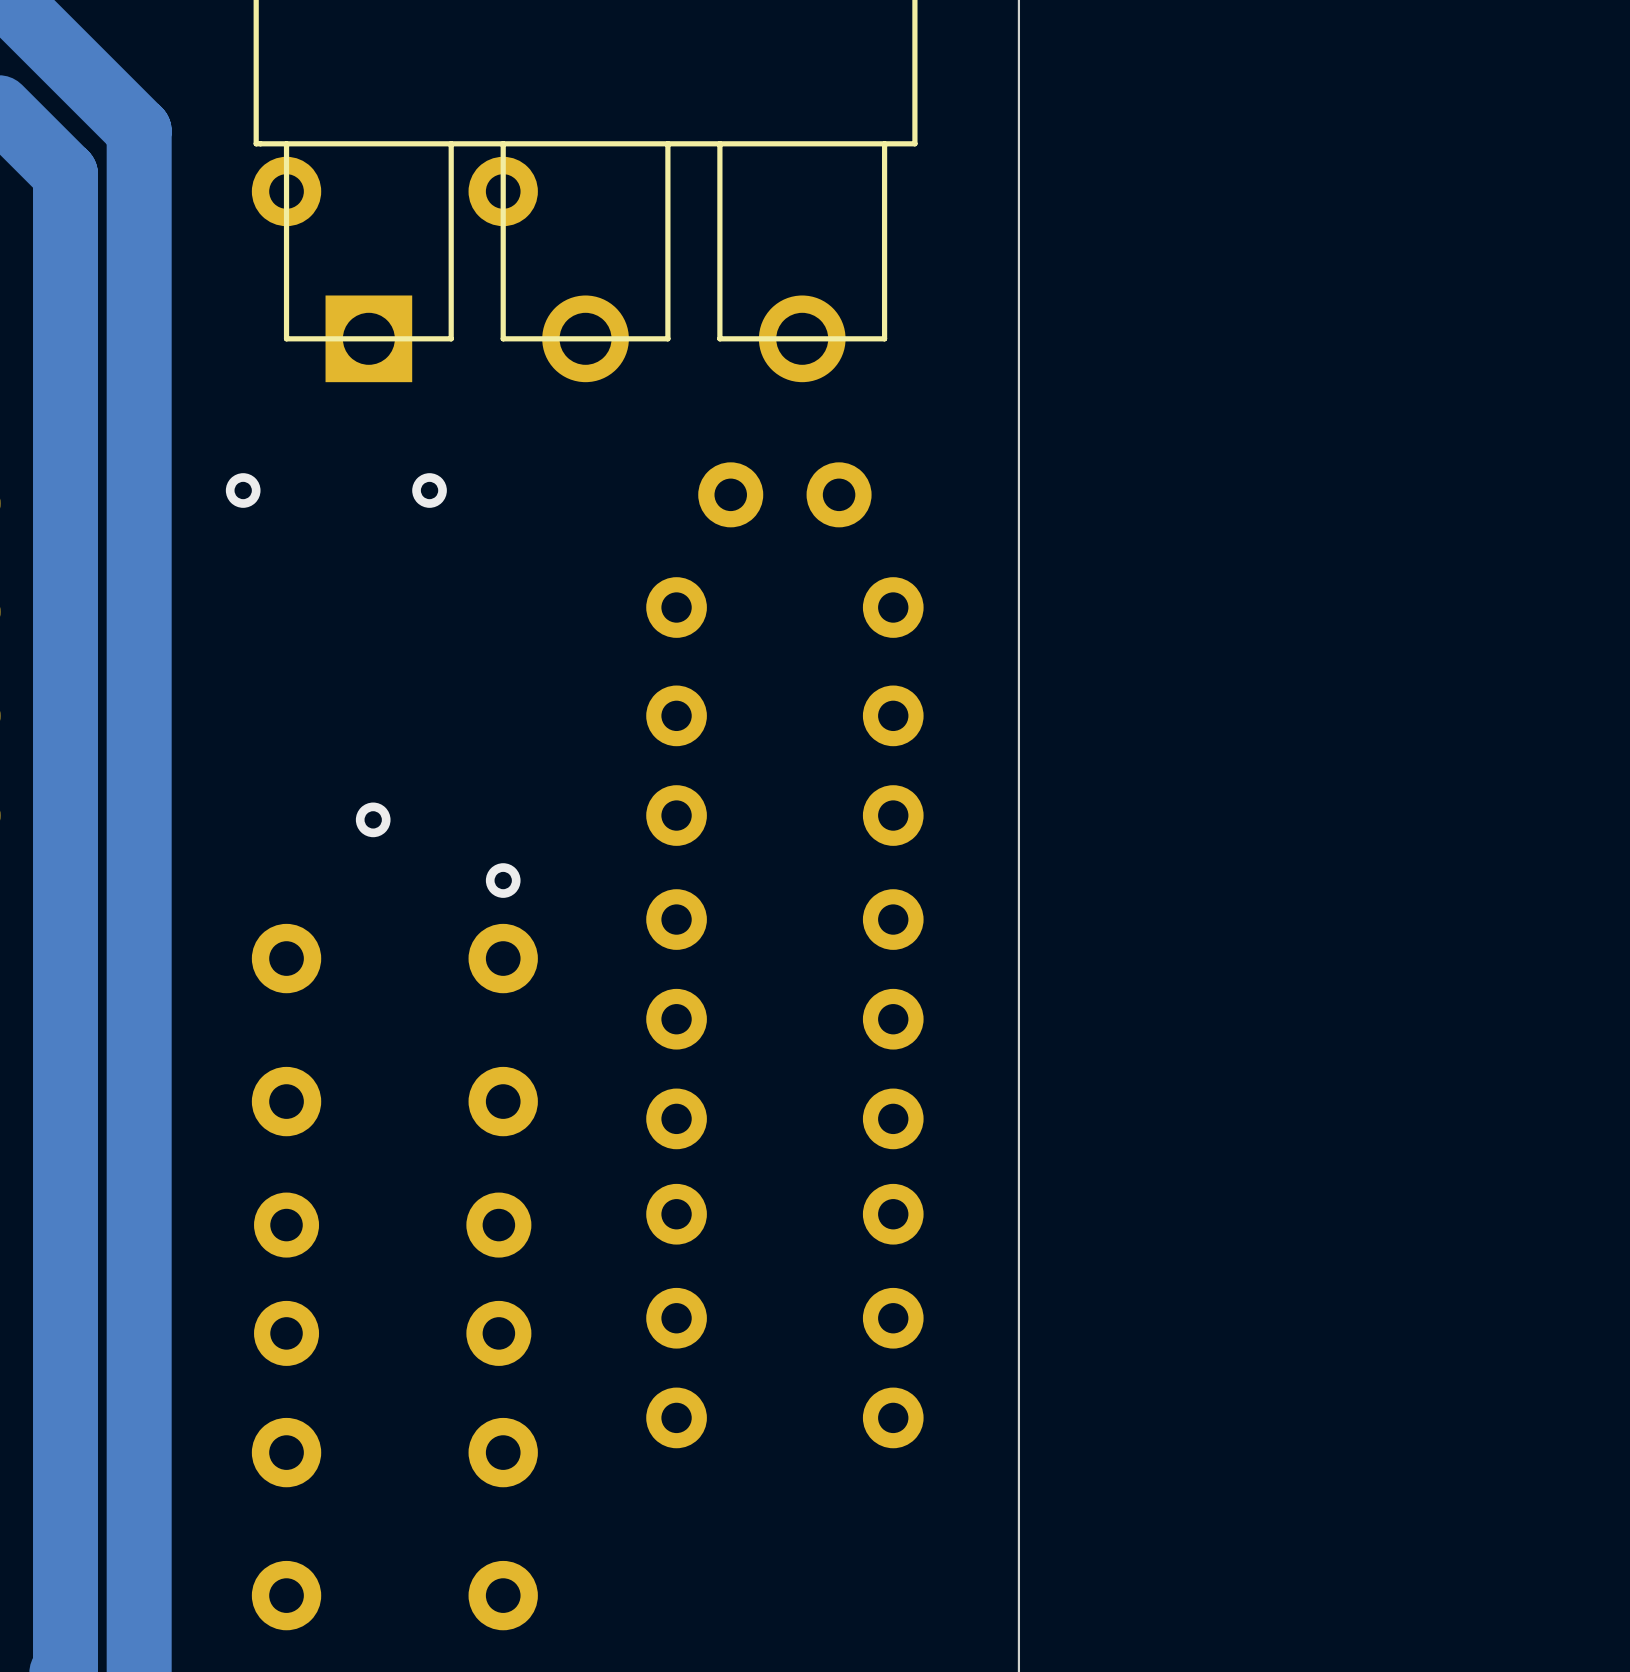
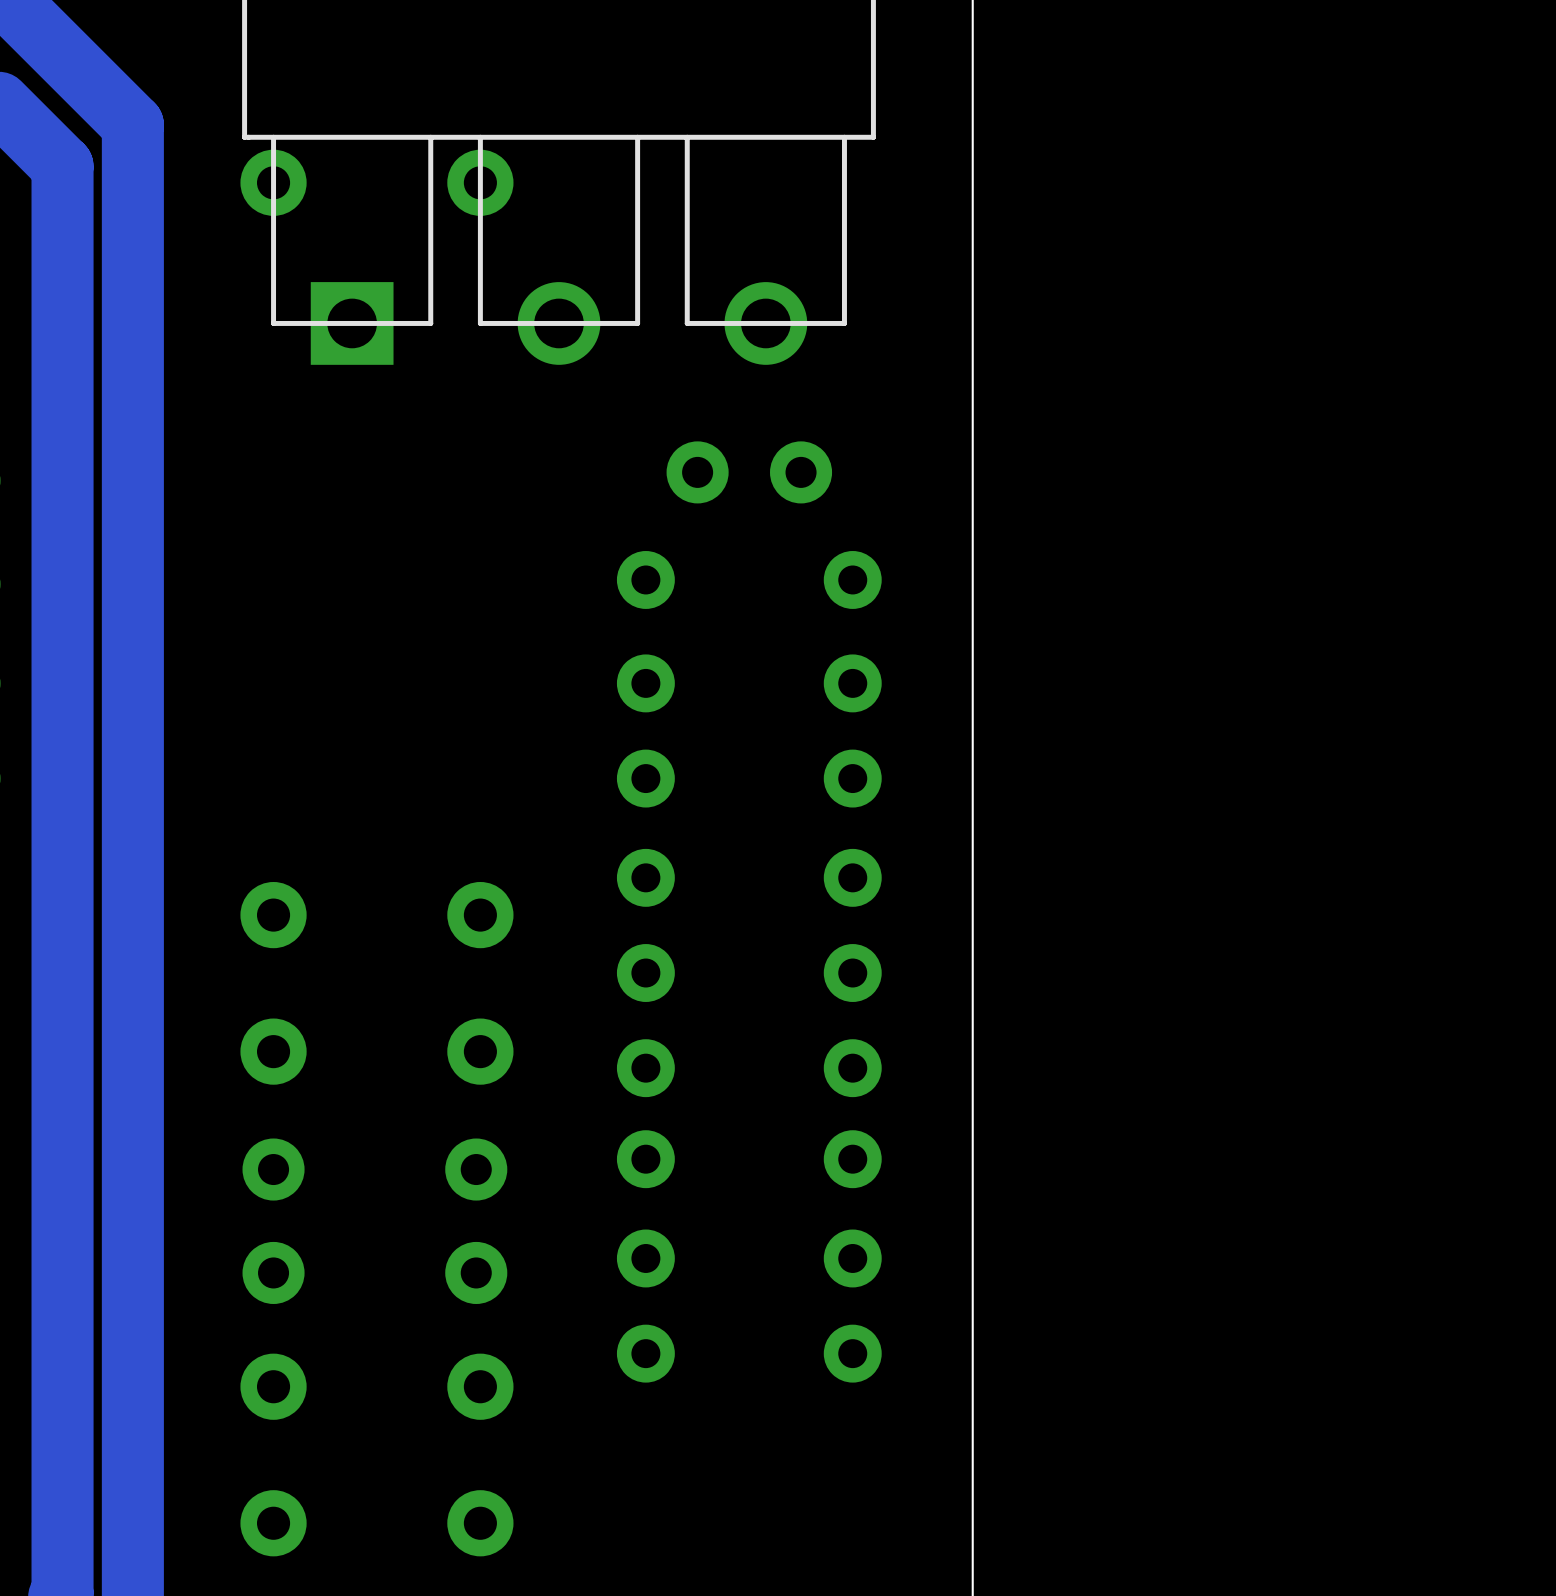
via: (243, 490) -> none
via: (429, 490) -> none
via: (373, 819) -> none
via: (503, 880) -> none

